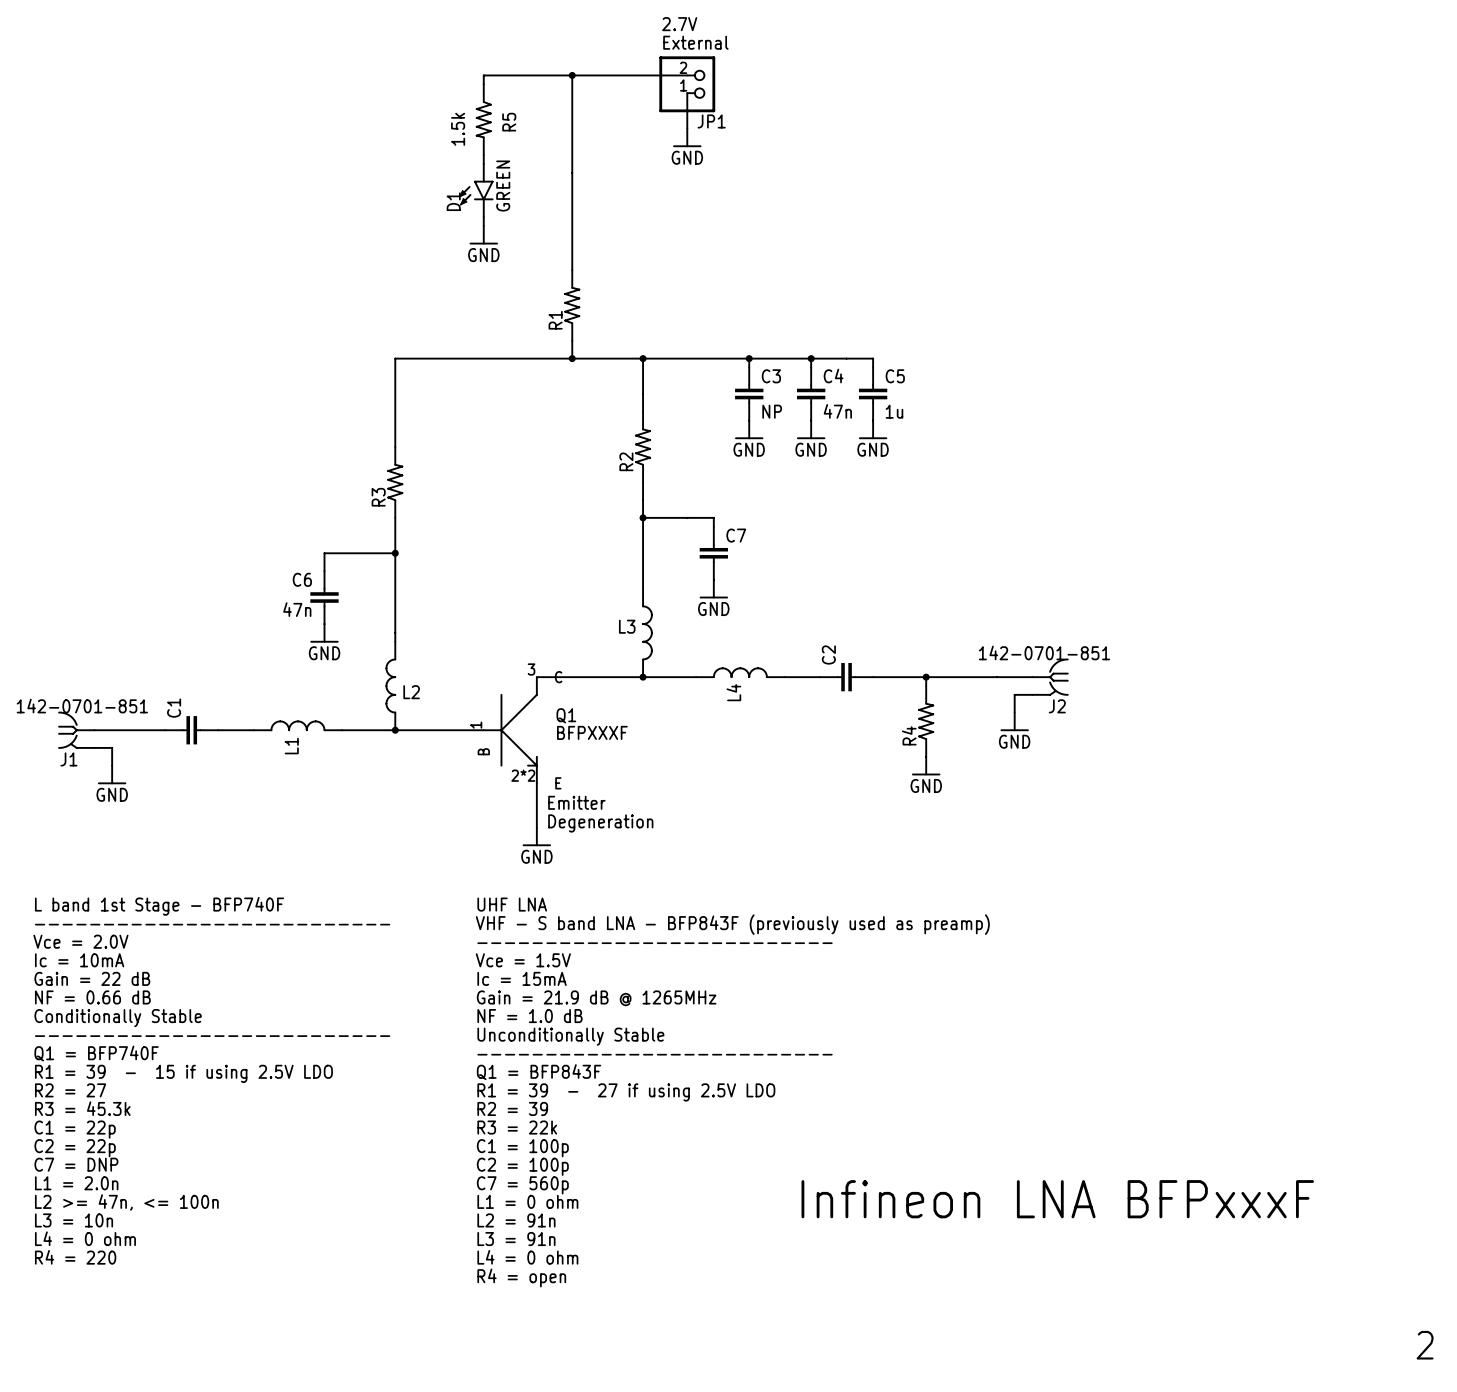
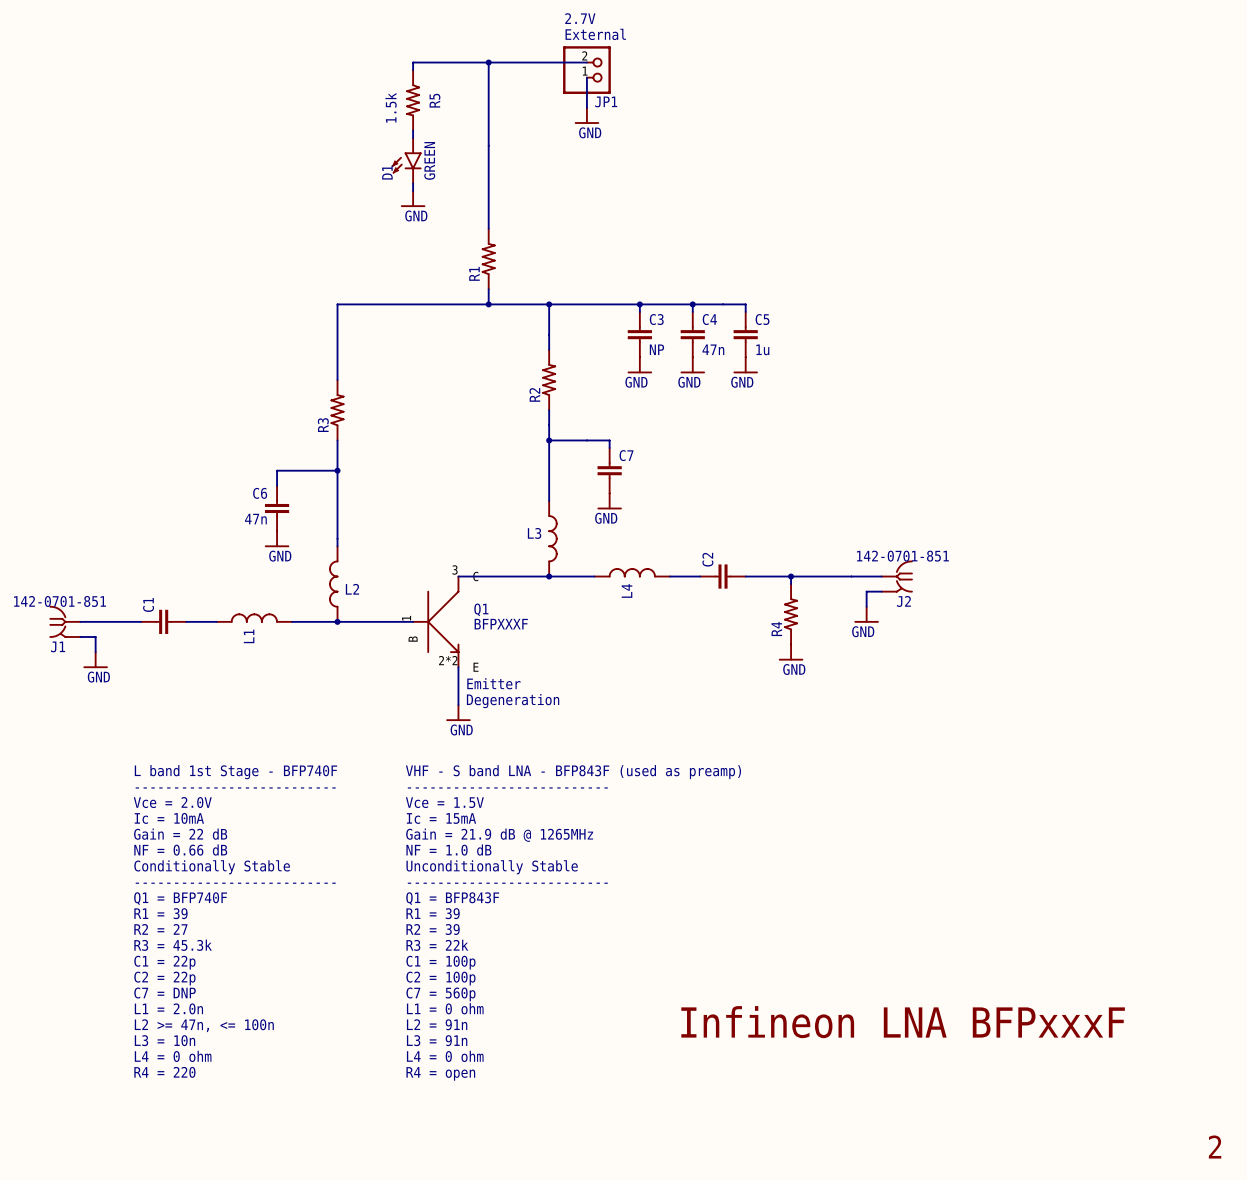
text: UHF LNA (512, 904) -> VHF - S band LNA - BFP843F (used as preamp) (573, 772)
text position: L band 1st Stage - BFP740F (159, 906) -> L band 1st Stage - BFP740F (235, 772)
text position: -------------------------- (212, 924) -> -------------------------- (235, 787)
text: VHF - S band LNA - BFP843F (previously used as preamp) (732, 924) -> -------------------------- (507, 787)
text position: Vce = 2.0V (80, 941) -> Vce = 2.0V (172, 802)
text: -------------------------- (655, 943) -> Vce = 1.5V (444, 802)
text position: Ic = 10mA (79, 960) -> Ic = 10mA (169, 818)
text: Vce = 1.5V (523, 960) -> Ic = 15mA (441, 818)
text position: Gain = 22 dB (92, 978) -> Gain = 22 dB (180, 834)
text: Ic = 15mA (522, 978) -> Gain = 21.9 dB @ 1265MHz (499, 835)
text position: NF = 0.66 dB (92, 997) -> NF = 0.66 dB (180, 850)
text: Gain = 21.9 dB @ 1265MHz (596, 998) -> NF = 1.0 dB (448, 850)
text: NF = 1.0 dB (529, 1016) -> Unconditionally Stable (492, 867)
text position: Conditionally Stable (118, 1018) -> Conditionally Stable (212, 867)
text position: -------------------------- (212, 1036) -> -------------------------- (235, 883)
text: Unconditionally Stable (570, 1036) -> -------------------------- (507, 883)
text position: Q1 = BFP740F (96, 1053) -> Q1 = BFP740F (180, 898)
text: -------------------------- (655, 1054) -> Q1 = BFP843F (452, 898)
text: none -> R1 = 39 (160, 913)
text: Q1 = BFP843F (539, 1072) -> R1 = 39 (433, 913)
text: R1 = 39 - 15 if using 2.5V LDO (183, 1073) -> none
text position: R2 = 27 (70, 1090) -> R2 = 27 (160, 929)
text: R1 = 39 - 27 if using 2.5V LDO (626, 1092) -> R2 = 39 (433, 929)
text position: R3 = 45.3k (82, 1108) -> R3 = 45.3k (173, 945)
text: R2 = 39 (512, 1108) -> R3 = 22k (437, 945)
text: R3 = 22k (517, 1127) -> C1 = 100p (440, 962)
text position: C1 = 22p (75, 1129) -> C1 = 22p (164, 962)
text position: C2 = 22p (75, 1148) -> C2 = 22p (164, 978)
text: C1 = 100p (522, 1148) -> C2 = 100p (440, 978)
text position: C7 = DNP (76, 1164) -> C7 = DNP (165, 993)
text: C2 = 100p (522, 1166) -> C7 = 560p (440, 994)
text position: L1 = 2.0n (76, 1183) -> L1 = 2.0n (168, 1008)
text: C7 = 560p (522, 1185) -> L1 = 0 ohm (445, 1008)
text: L1 = 0 ohm (527, 1201) -> L2 = 91n (437, 1024)
text position: L2 >= 47n, <= 100n (126, 1202) -> L2 >= 47n, <= 100n (204, 1025)
text position: L3 = 10n (74, 1220) -> L3 = 10n (164, 1040)
text: L2 = 91n (516, 1220) -> L3 = 91n (437, 1040)
text position: L4 = 0 ohm (85, 1238) -> L4 = 0 ohm (173, 1056)
text: L3 = 91n (516, 1239) -> L4 = 0 ohm (445, 1056)
text position: R4 = 220 (75, 1257) -> R4 = 220 (164, 1072)
text: L4 = 0 ohm (527, 1257) -> R4 = open (440, 1073)
text: R4 = open (521, 1277) -> none

